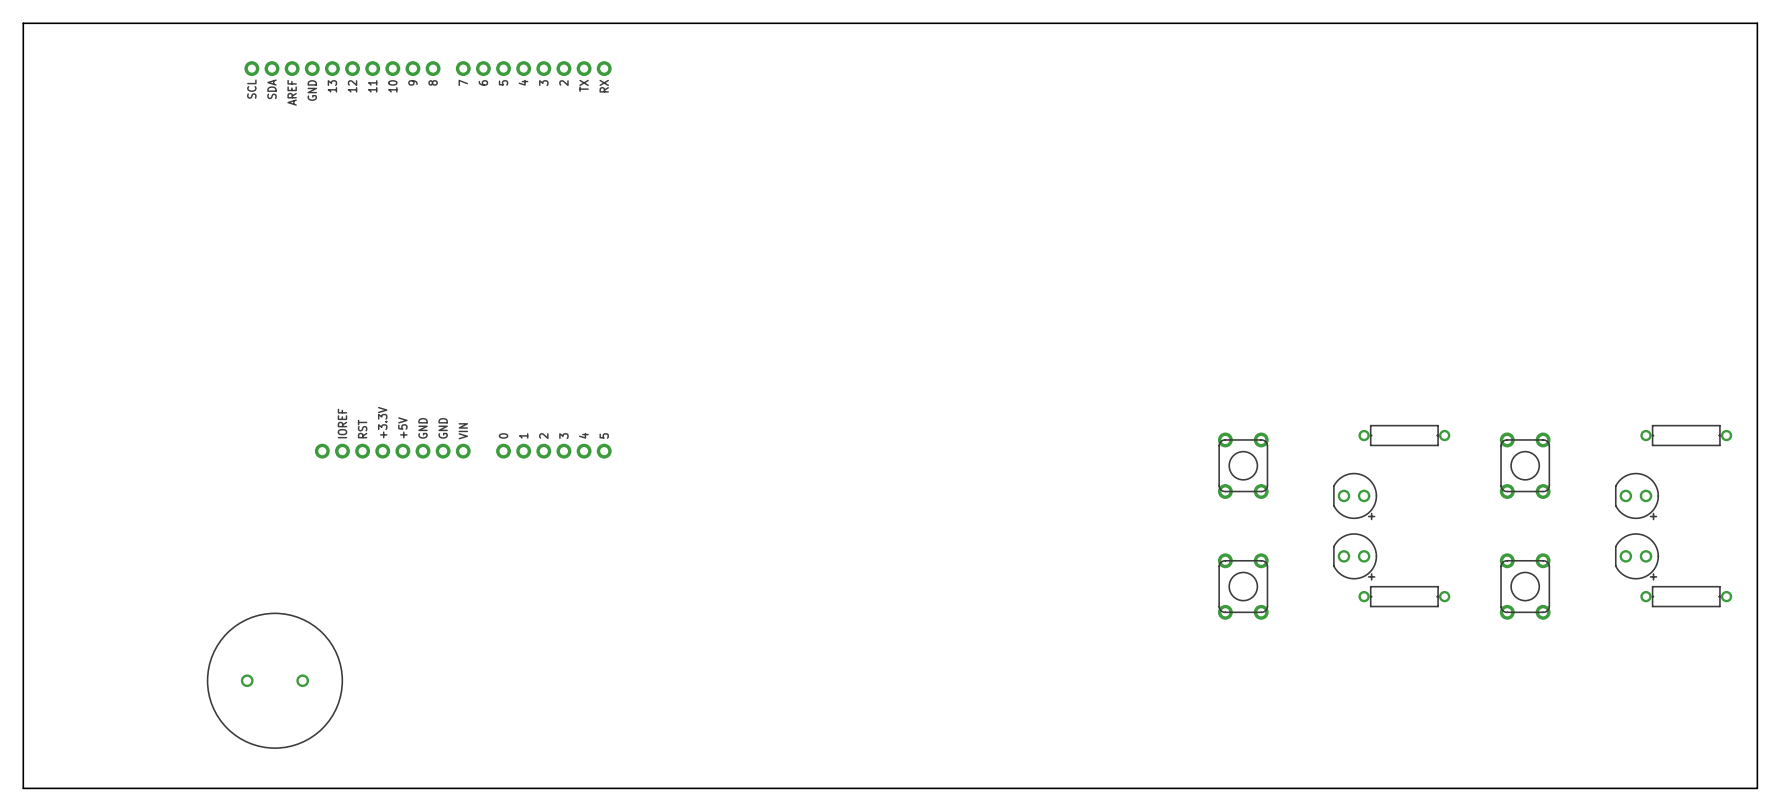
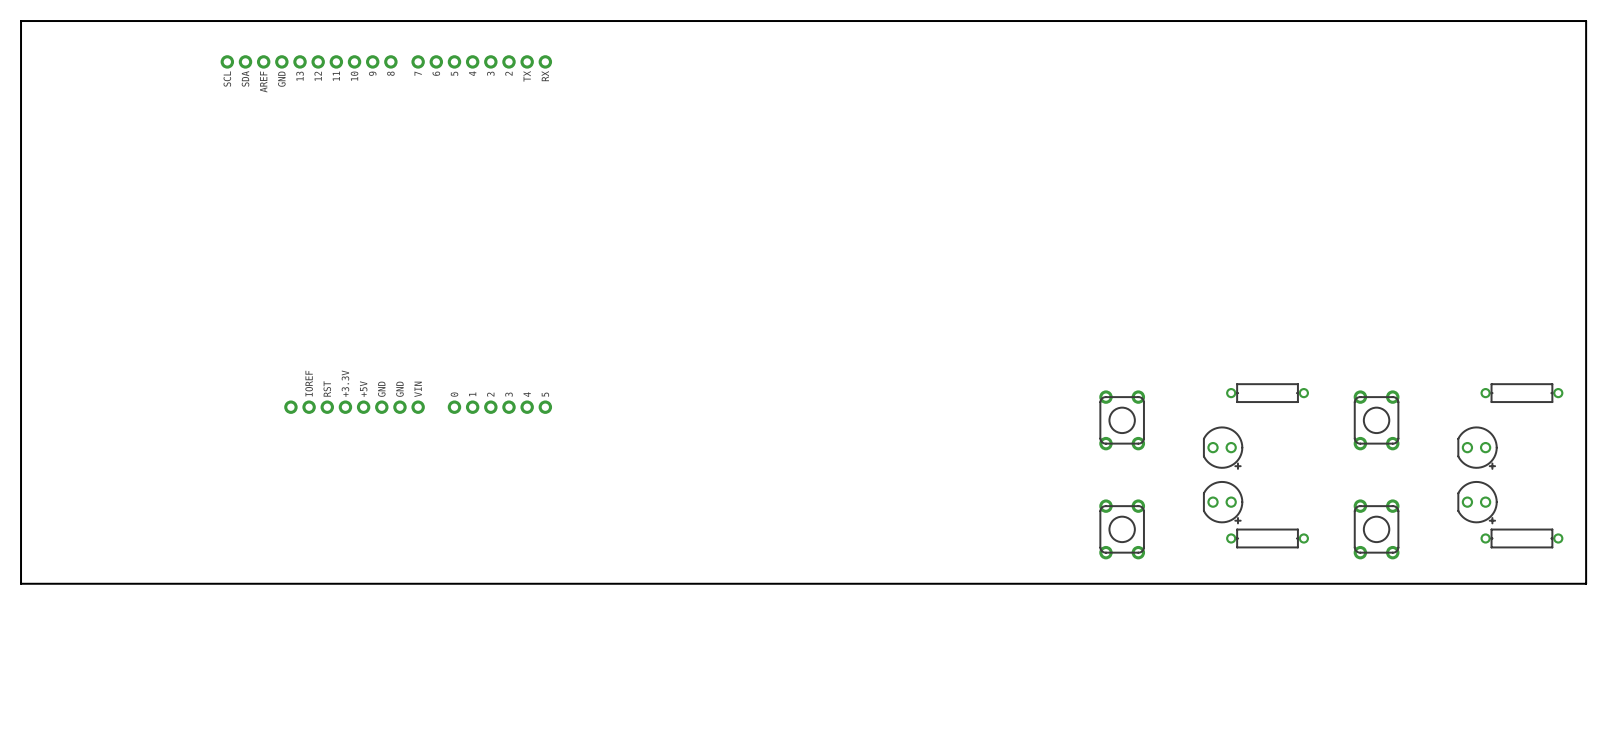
board edge: (23, 646) (23, 788) (1757, 788) (1757, 646) -> (21, 583) (1586, 583)
part: (274, 680) -> none

